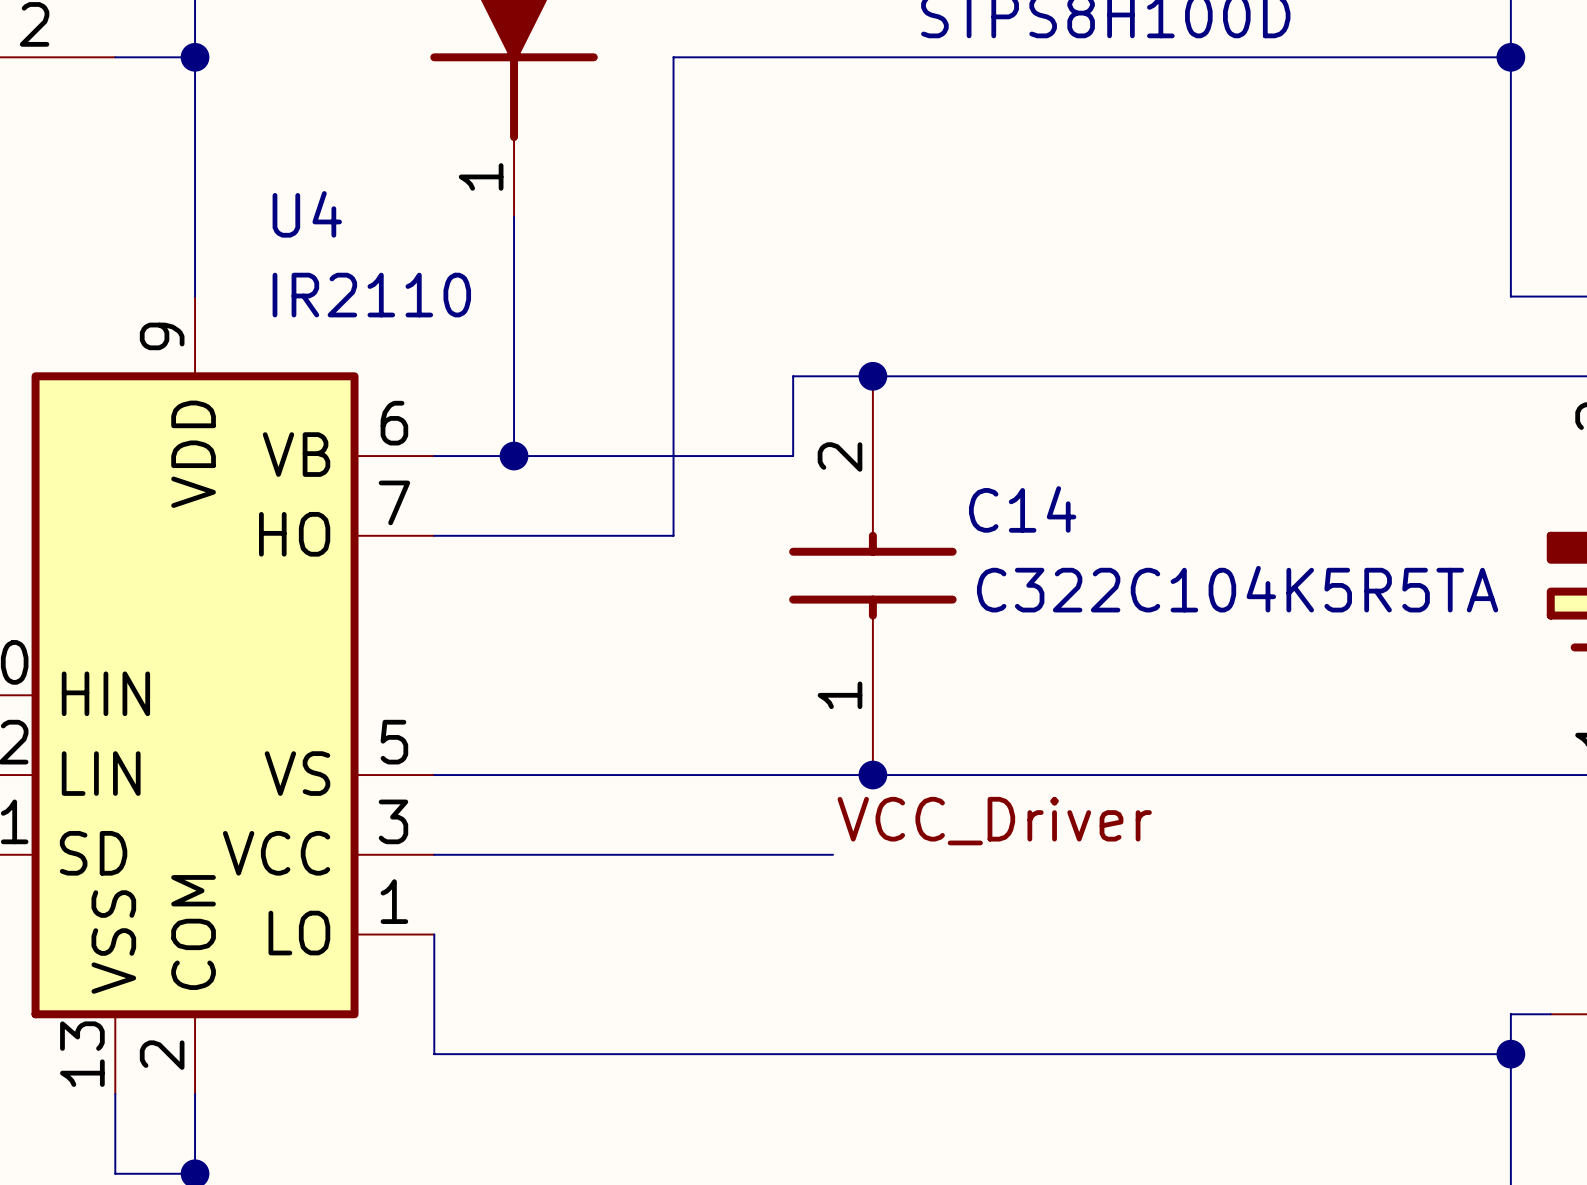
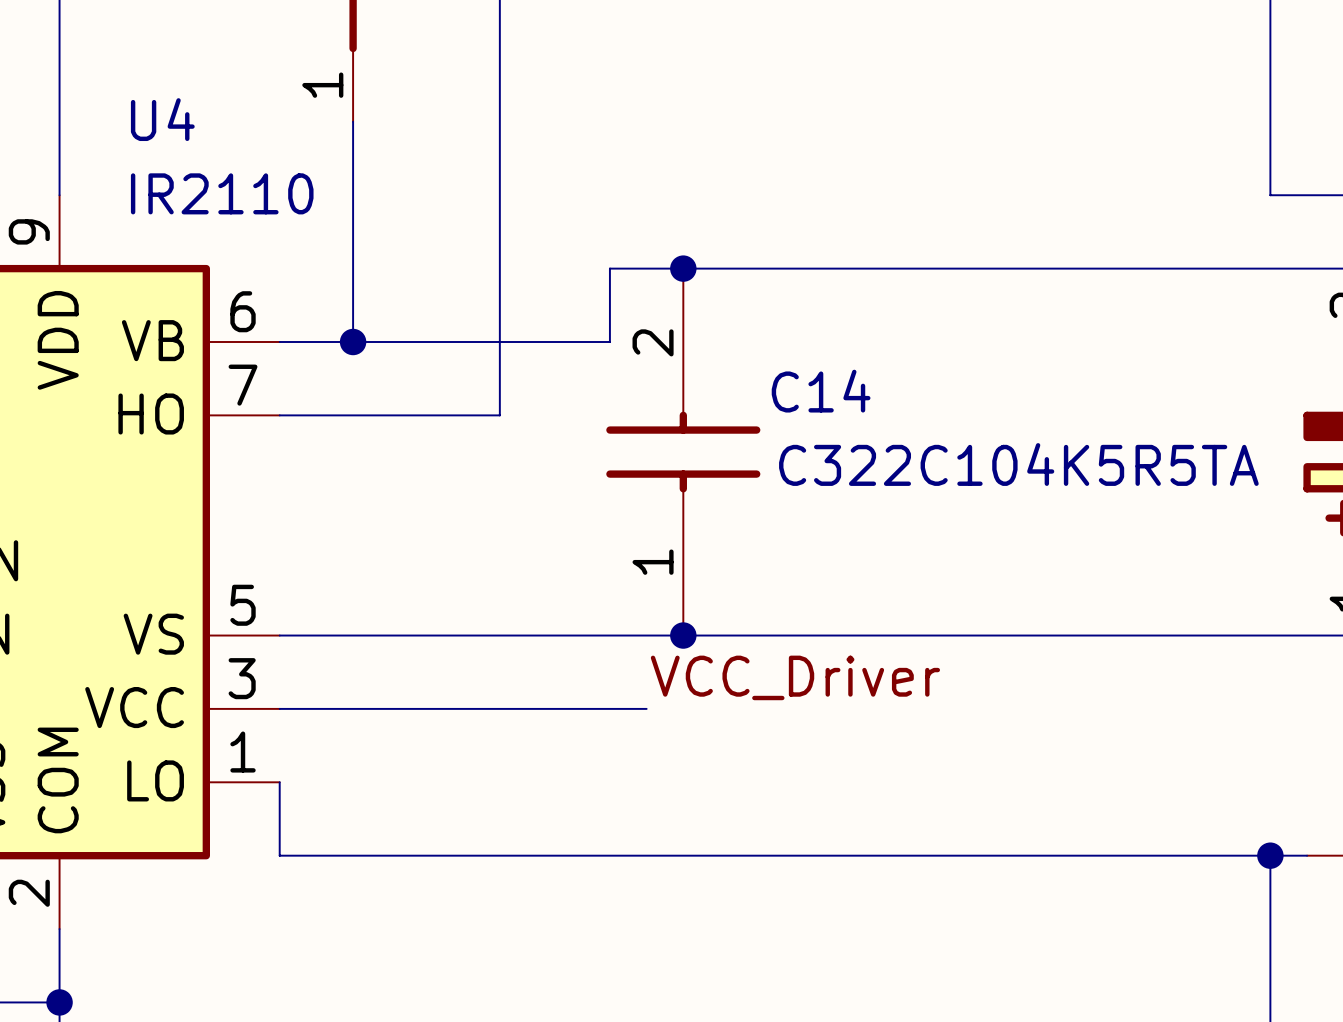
wire: (434, 1014) (434, 1054) (1510, 1054) -> (279, 855) (1270, 855)
junction position: (1510, 1054) -> (1270, 855)

